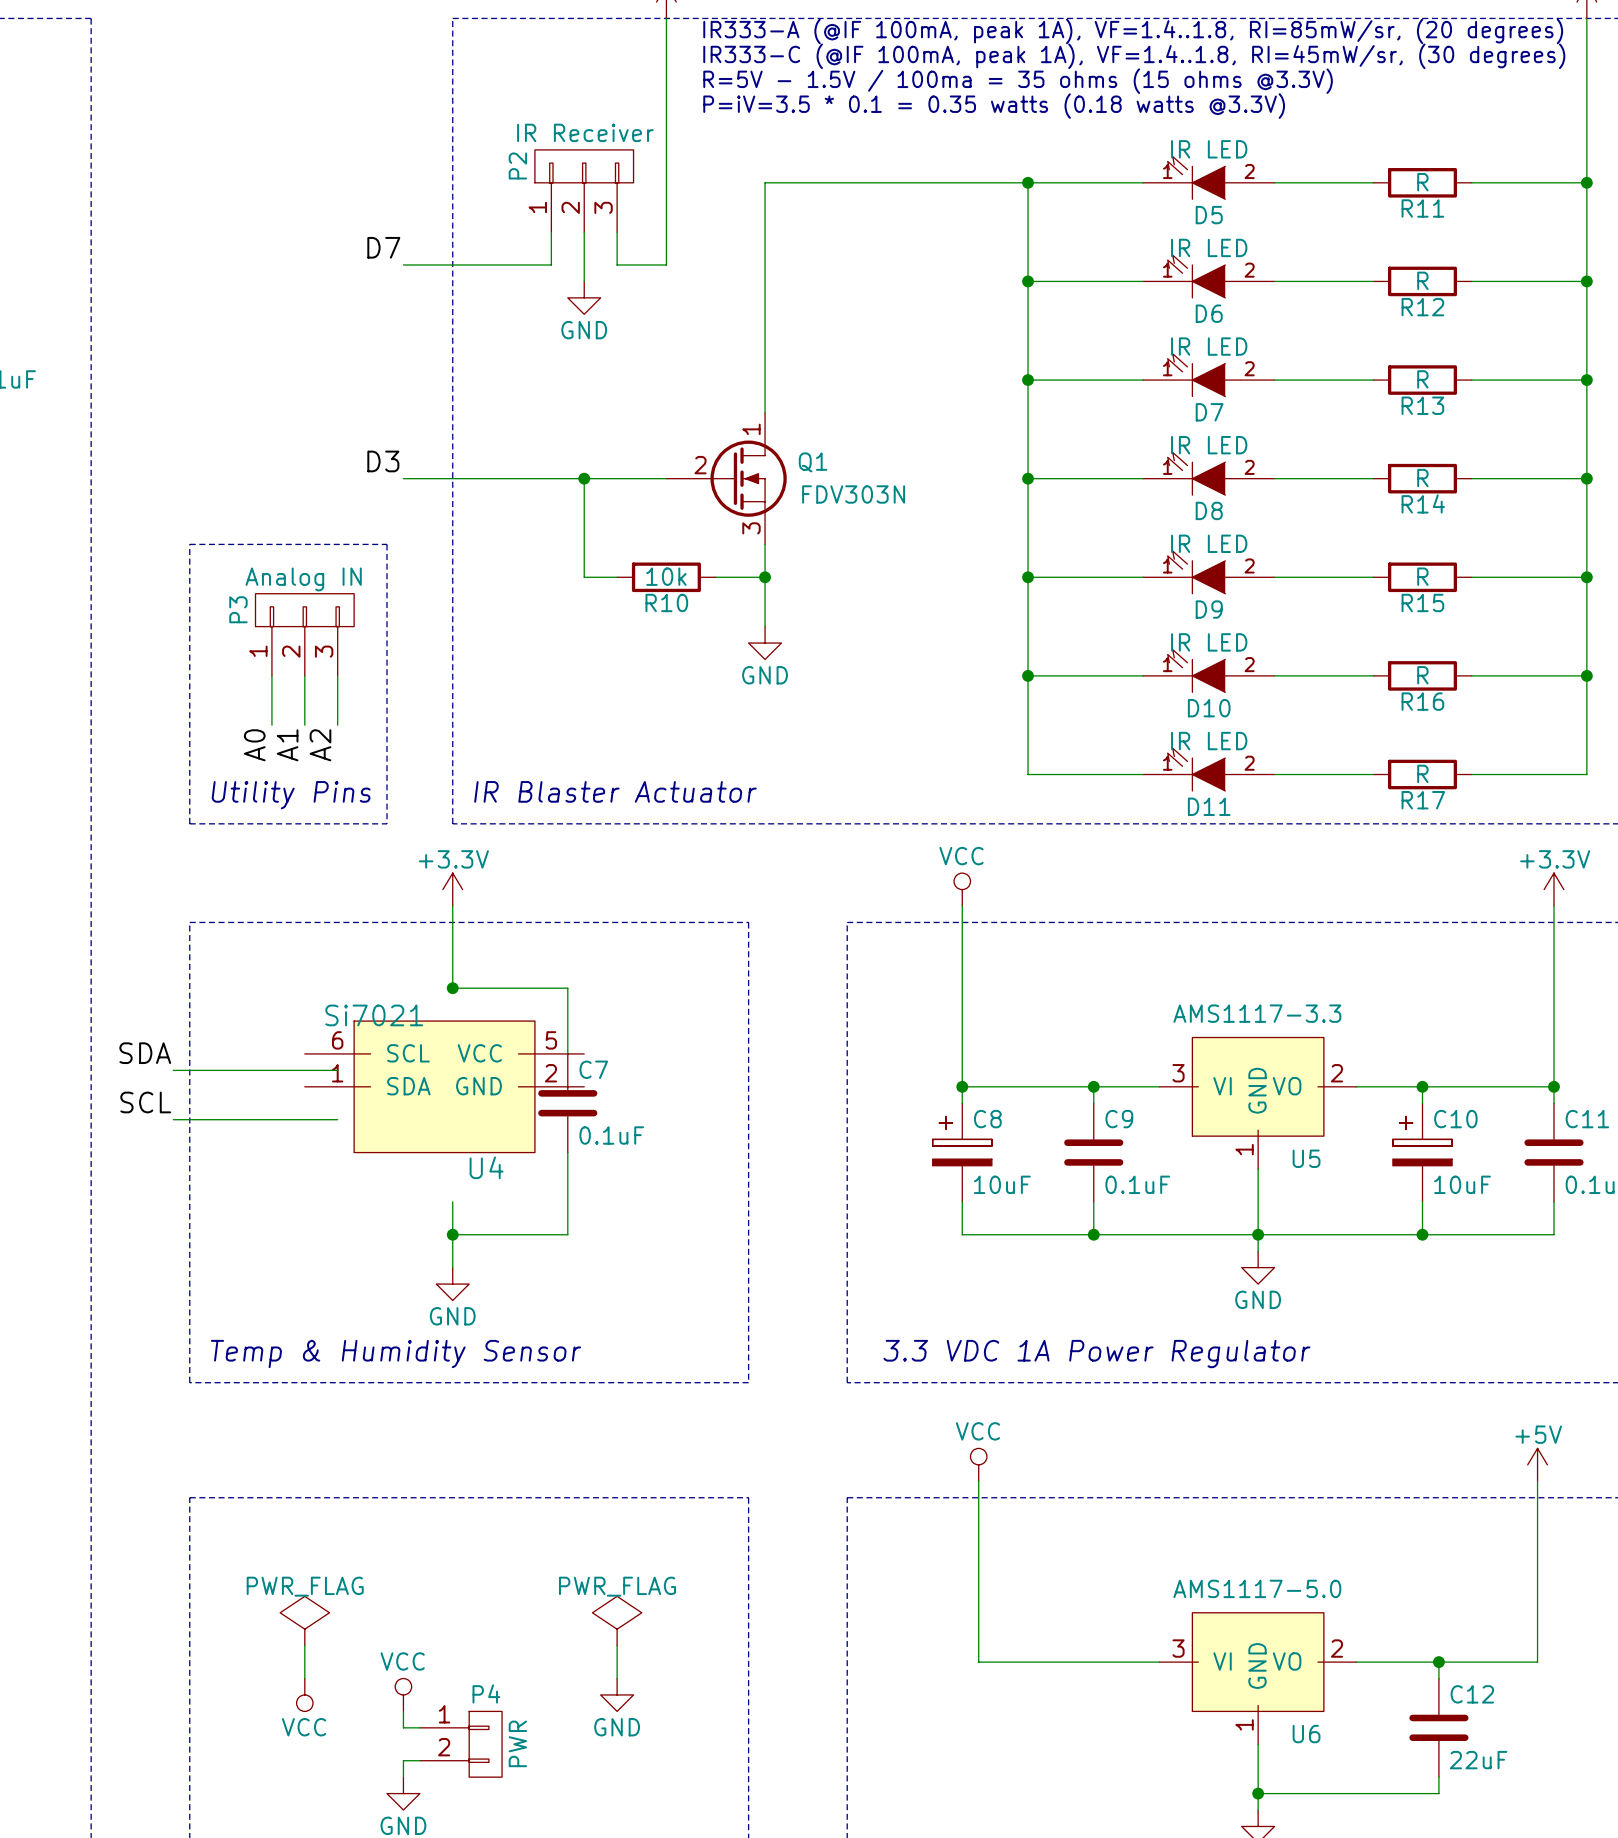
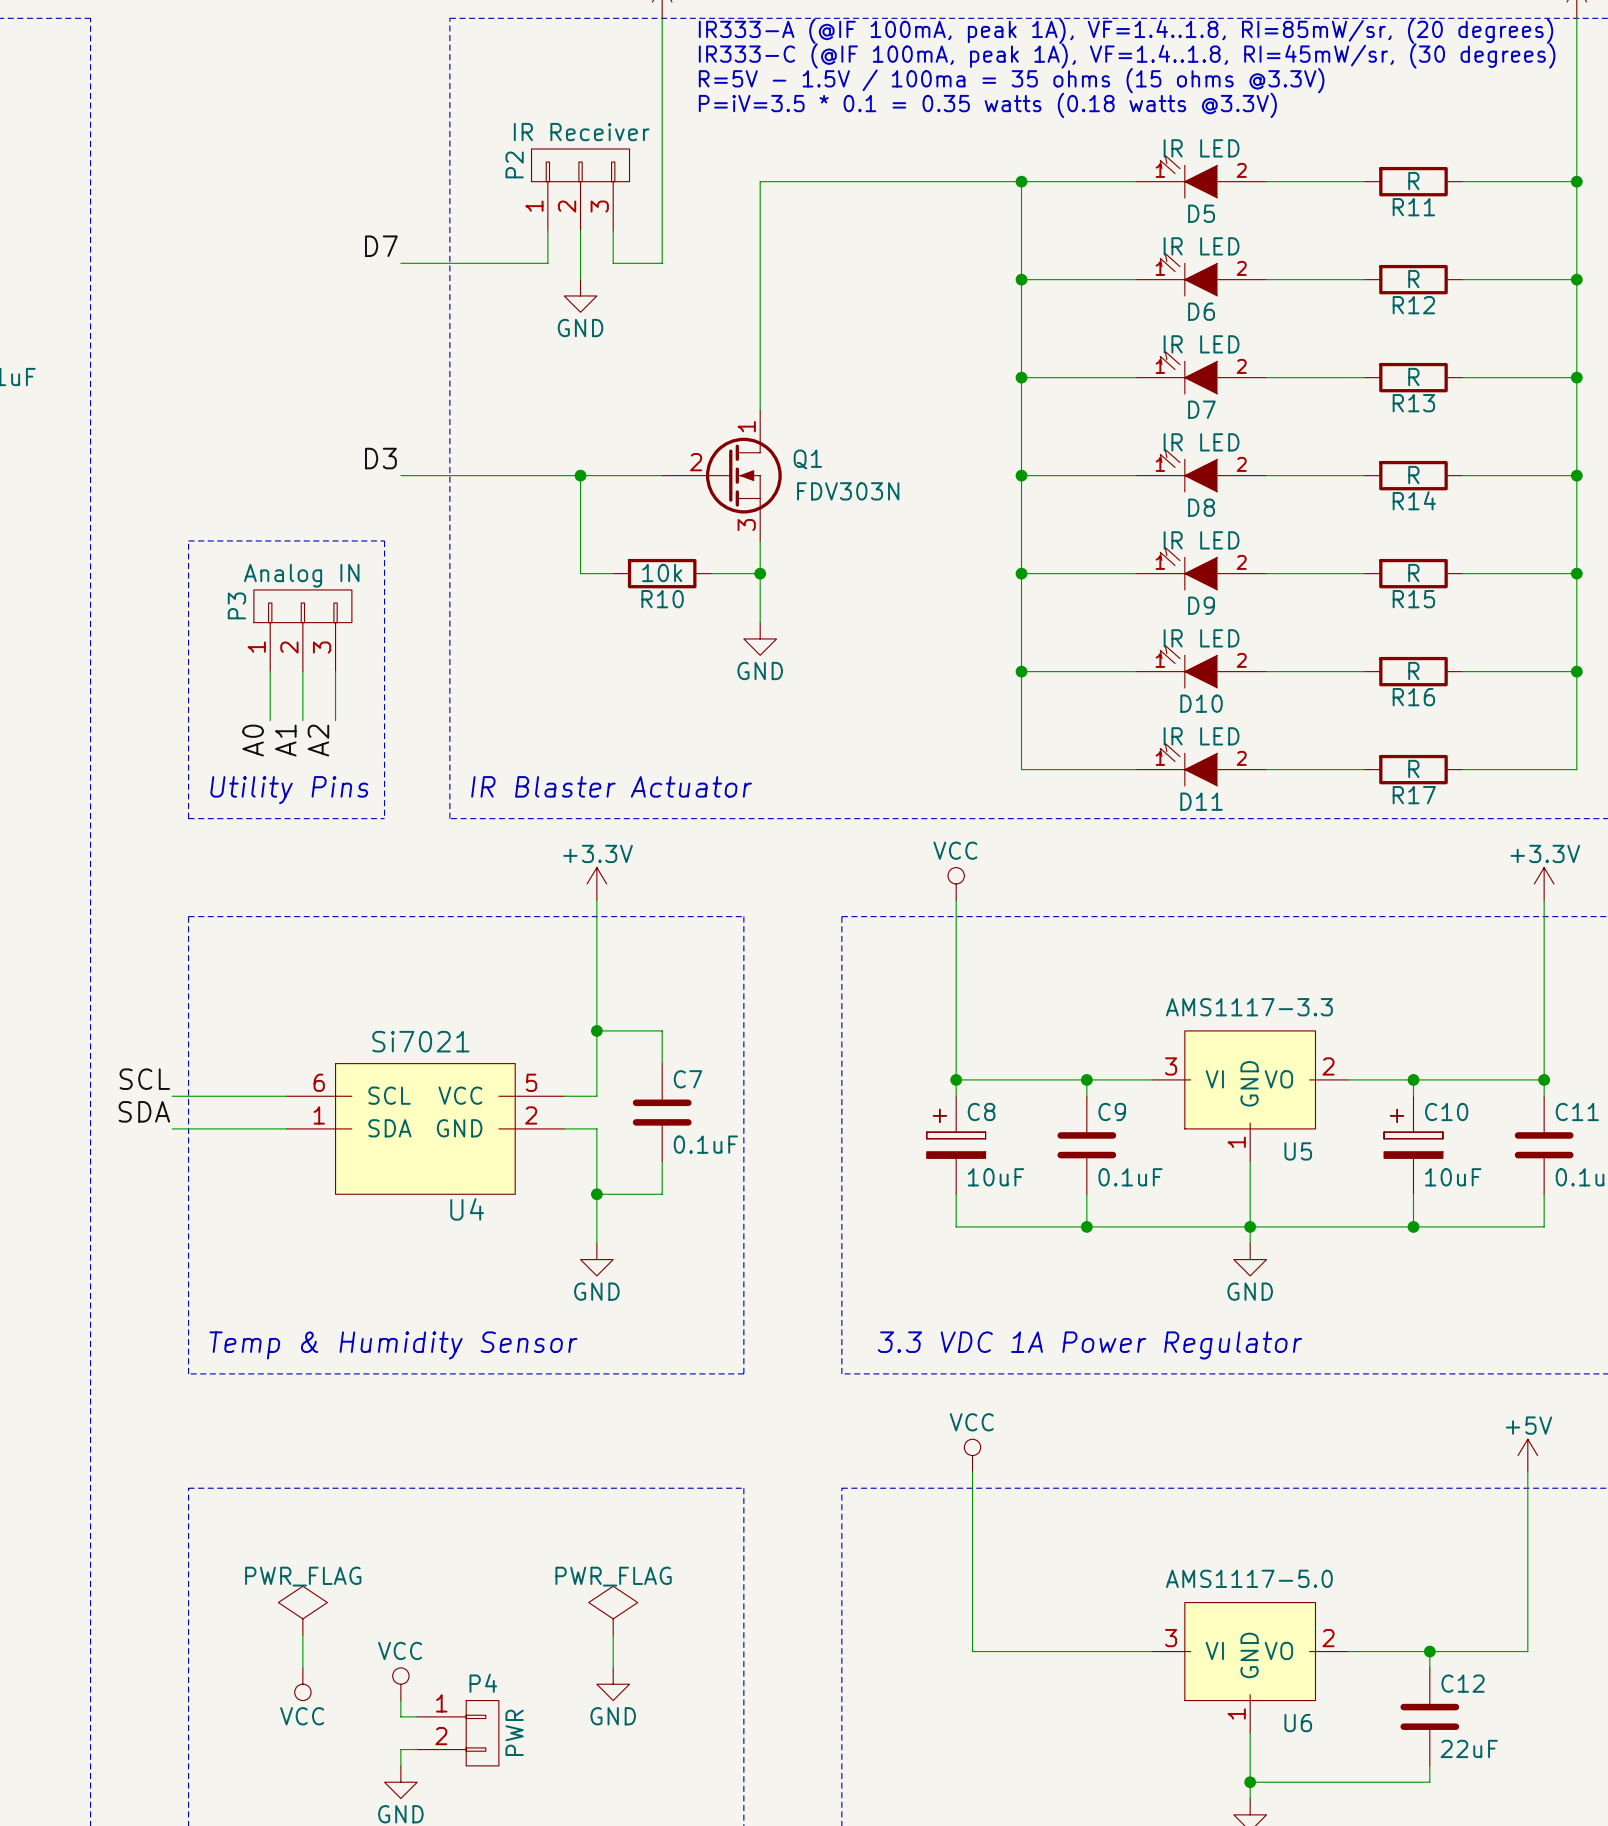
power symbol position: +3.3V (452, 889) -> +3.3V (596, 883)
wire: (452, 906) (452, 988) (567, 988) (567, 1053) -> none
wire: none -> (596, 900) (596, 1096) (564, 1096)
junction: (452, 988) -> none
U4 value position: Si7021 (374, 1015) -> Si7021 (420, 1041)
wire: none -> (596, 1030) (662, 1030) (662, 1063)
junction: none -> (596, 1030)
label position: SDA (145, 1053) -> SDA (144, 1111)
wire: (173, 1070) (337, 1070) -> none
U4 position: (444, 1086) -> (425, 1128)
label position: SCL (145, 1102) -> SCL (144, 1079)
wire: none -> (172, 1096) (286, 1096)
C7 position: (567, 1103) -> (662, 1112)
wire: (173, 1119) (337, 1119) -> none
wire: none -> (172, 1128) (286, 1128)
wire: none -> (564, 1128) (596, 1128) (596, 1243)
wire: (567, 1152) (567, 1234) (452, 1234) -> none
wire: none -> (662, 1161) (662, 1194) (596, 1194)
wire: (452, 1201) (452, 1267) -> none
junction: none -> (596, 1194)
junction: (452, 1234) -> none
power symbol position: GND (452, 1284) -> GND (596, 1259)

